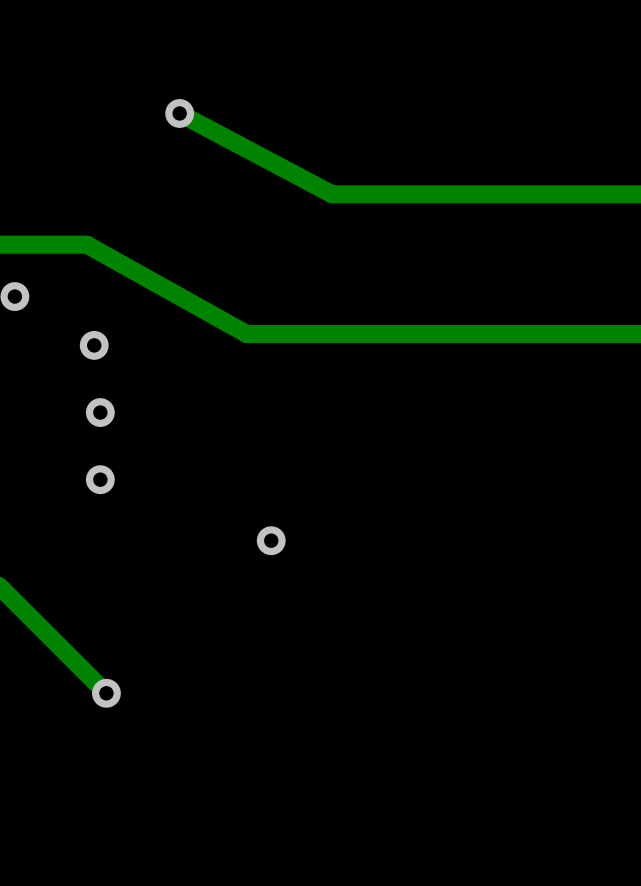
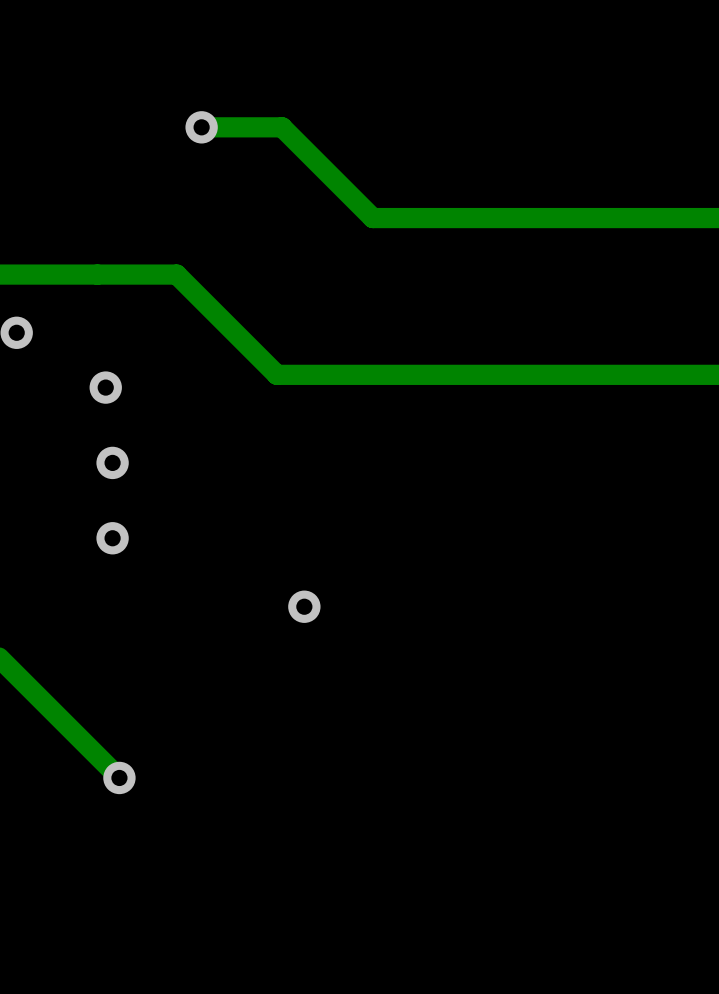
track: (179, 113) (332, 194) -> (201, 127) (282, 127) (372, 218)
track: (86, 244) (246, 334) -> (97, 274) (176, 274) (276, 374)

